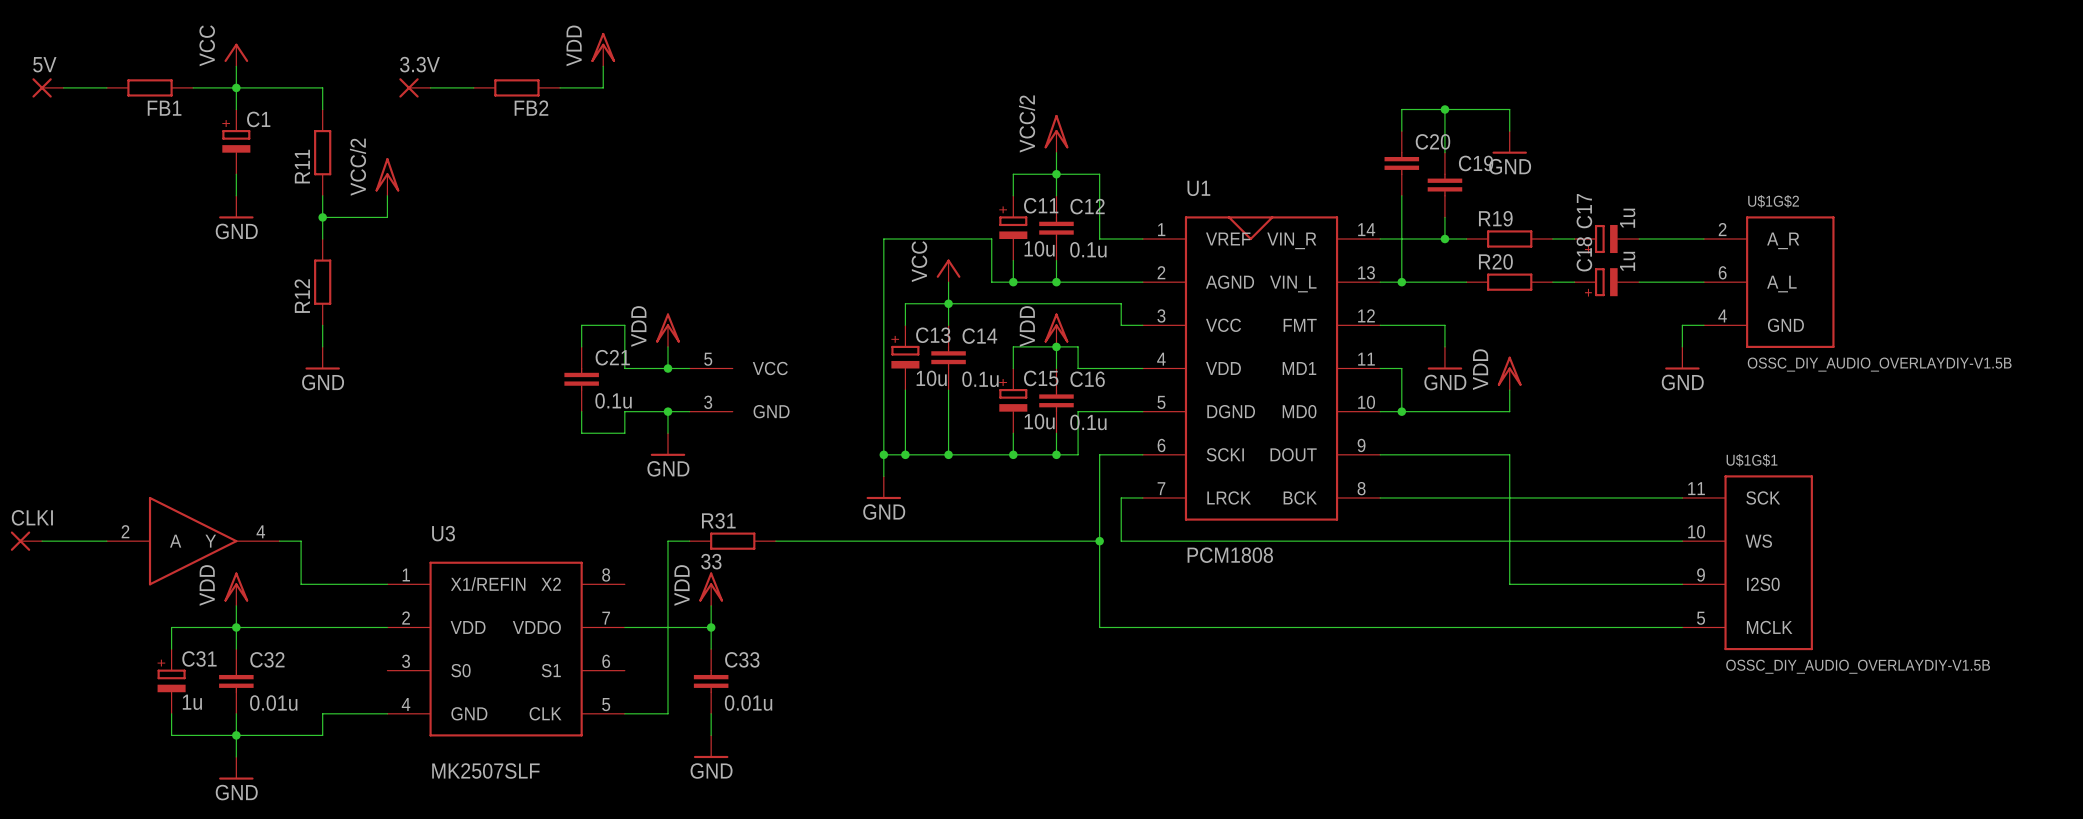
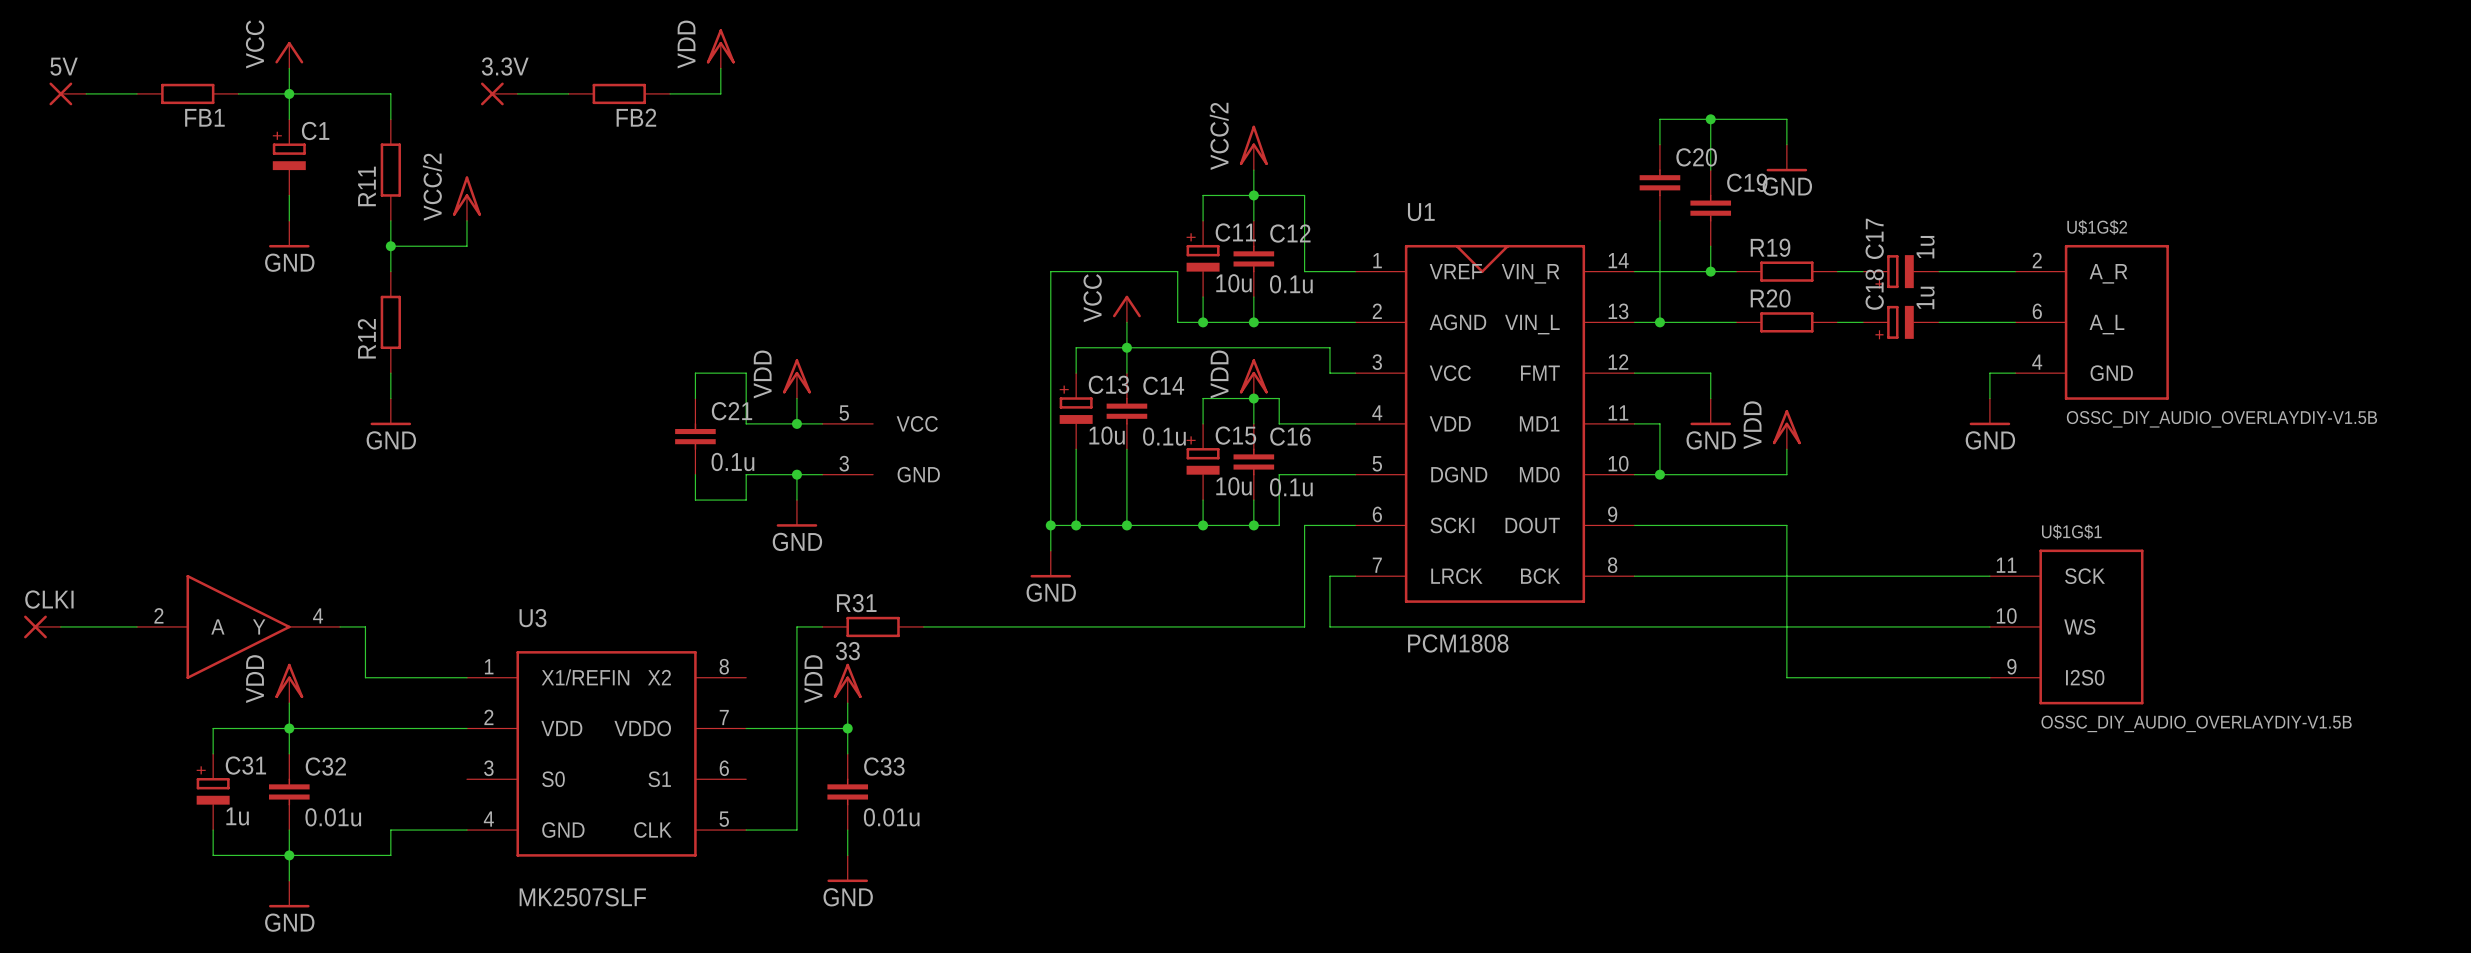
U$1G$1 symbol: [1682, 475, 1813, 651] -> [1989, 549, 2144, 705]
wire: (1099, 541) (1099, 627) (1682, 627) -> none
junction: (1099, 541) -> none
U$1G$1 value position: OSSC_DIY_AUDIO_OVERLAYDIY-V1.5B (1858, 666) -> OSSC_DIY_AUDIO_OVERLAYDIY-V1.5B (2196, 723)

